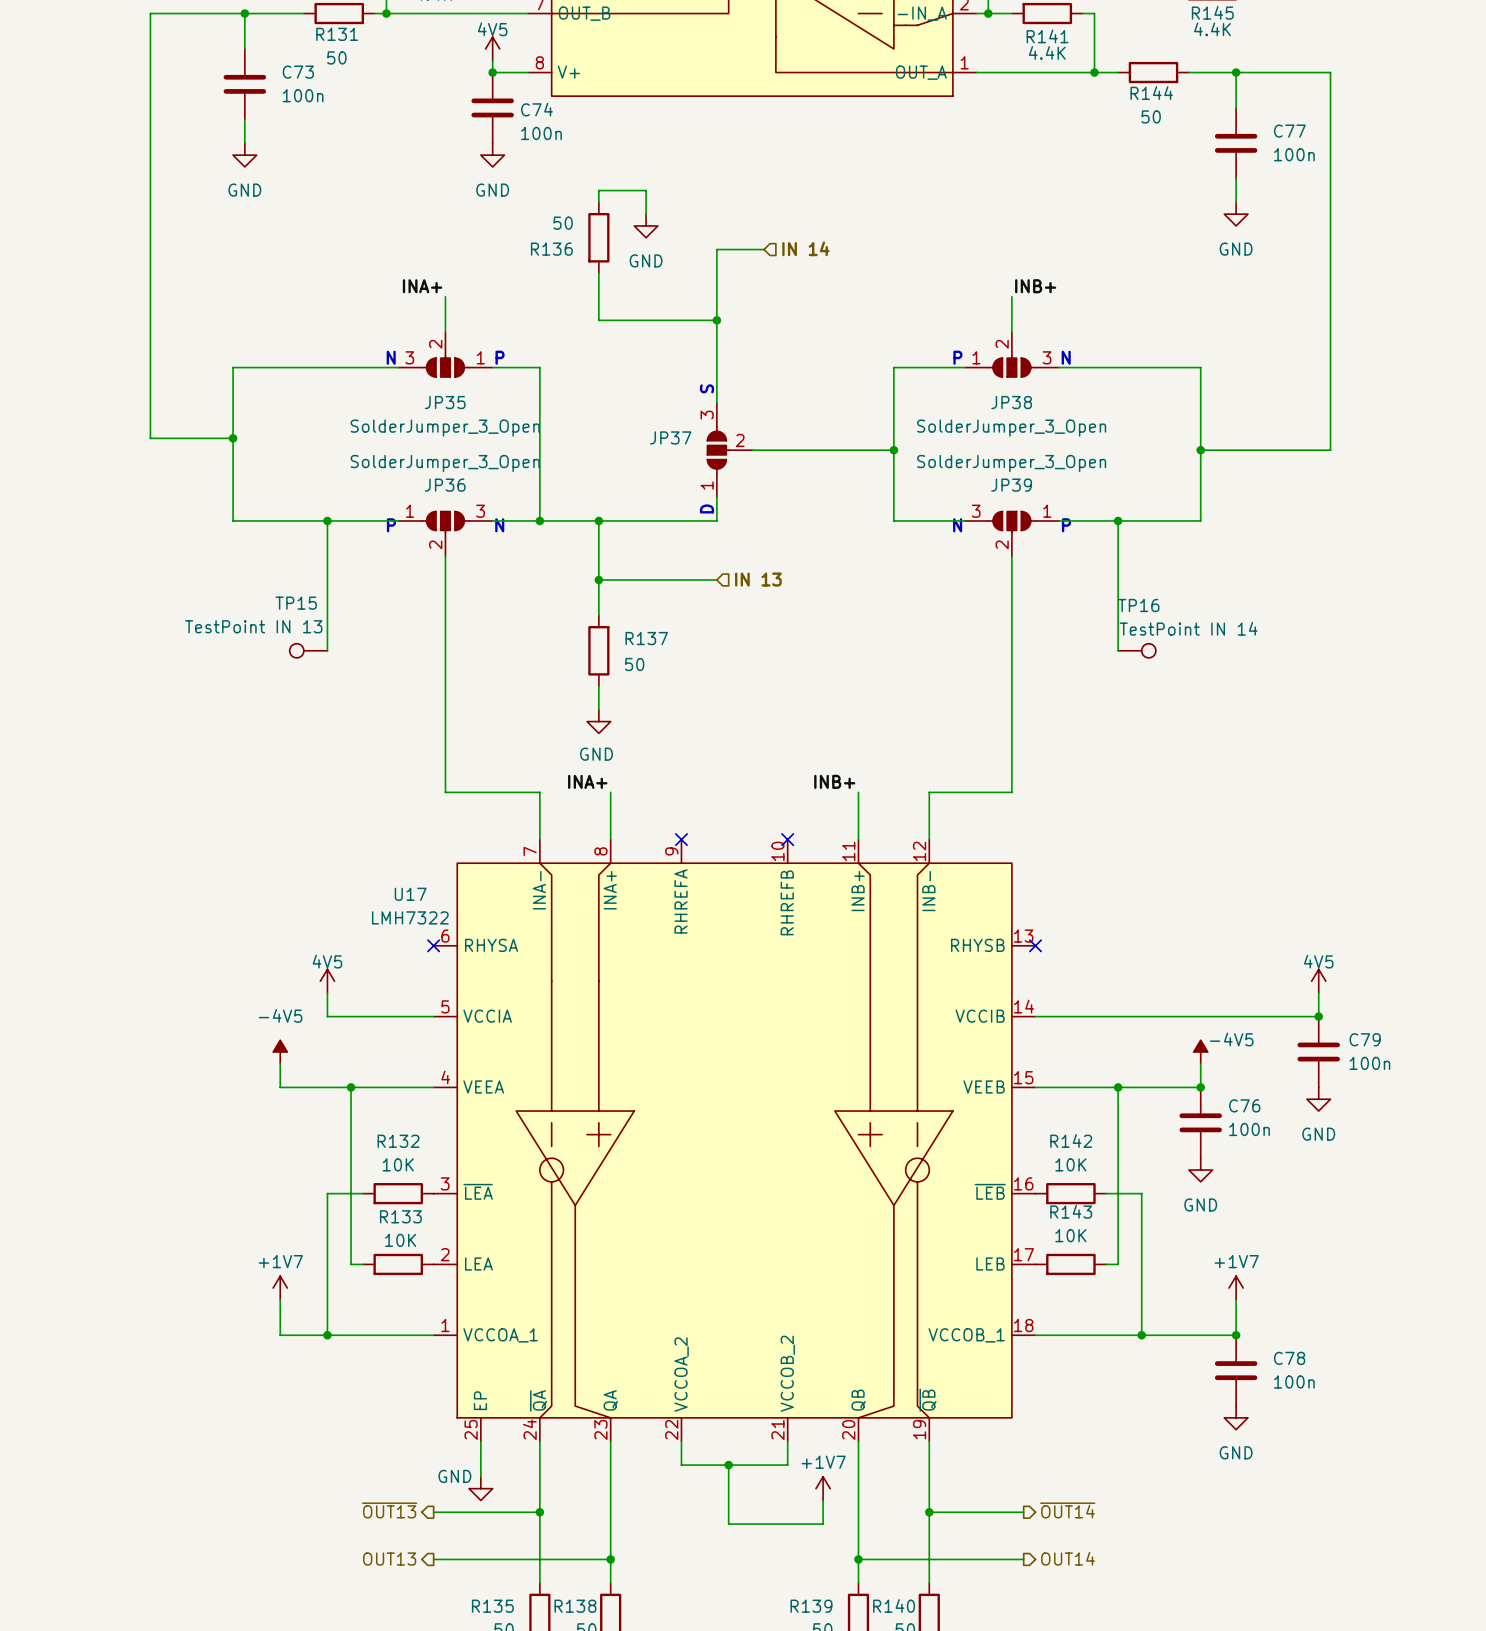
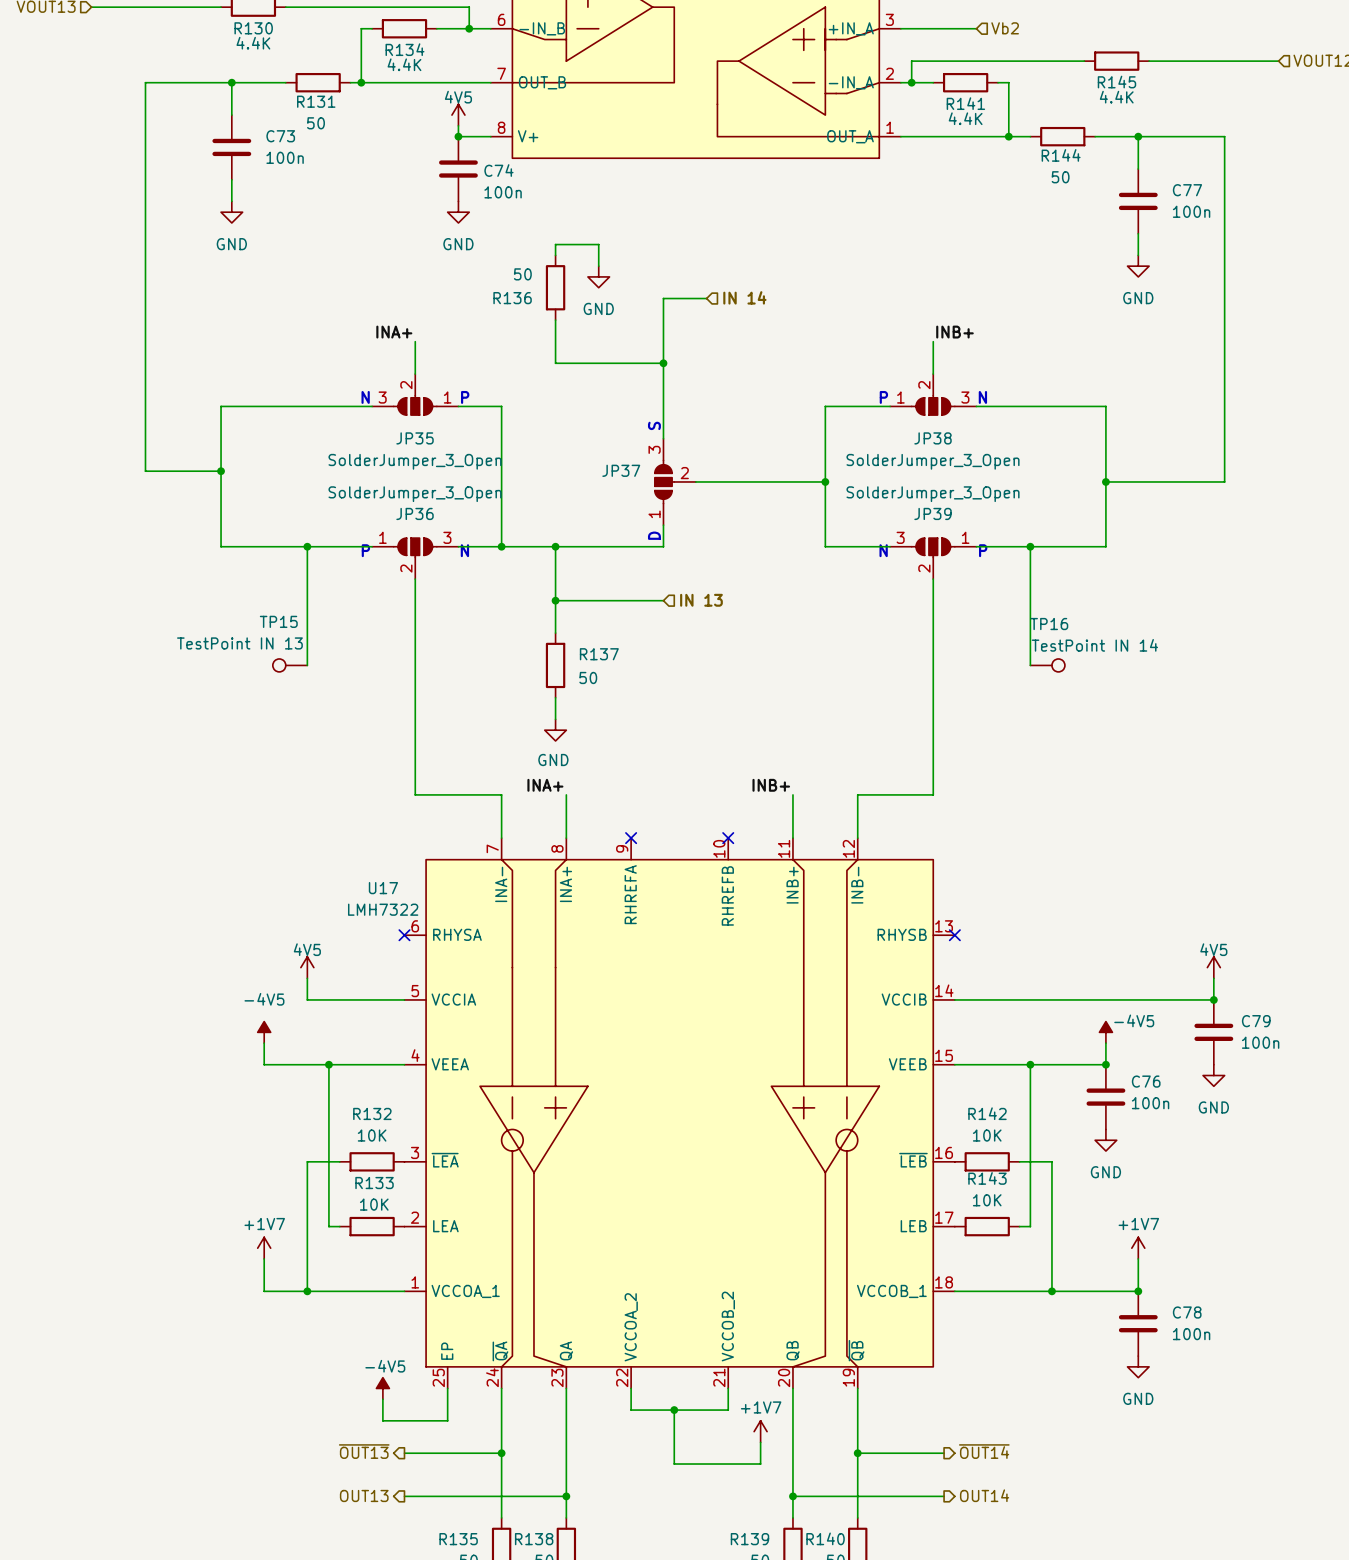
power symbol: none -> -4V5 (382, 1388)
wire: none -> (382, 1399) (382, 1420) (447, 1420)
power symbol: GND (480, 1488) -> none

